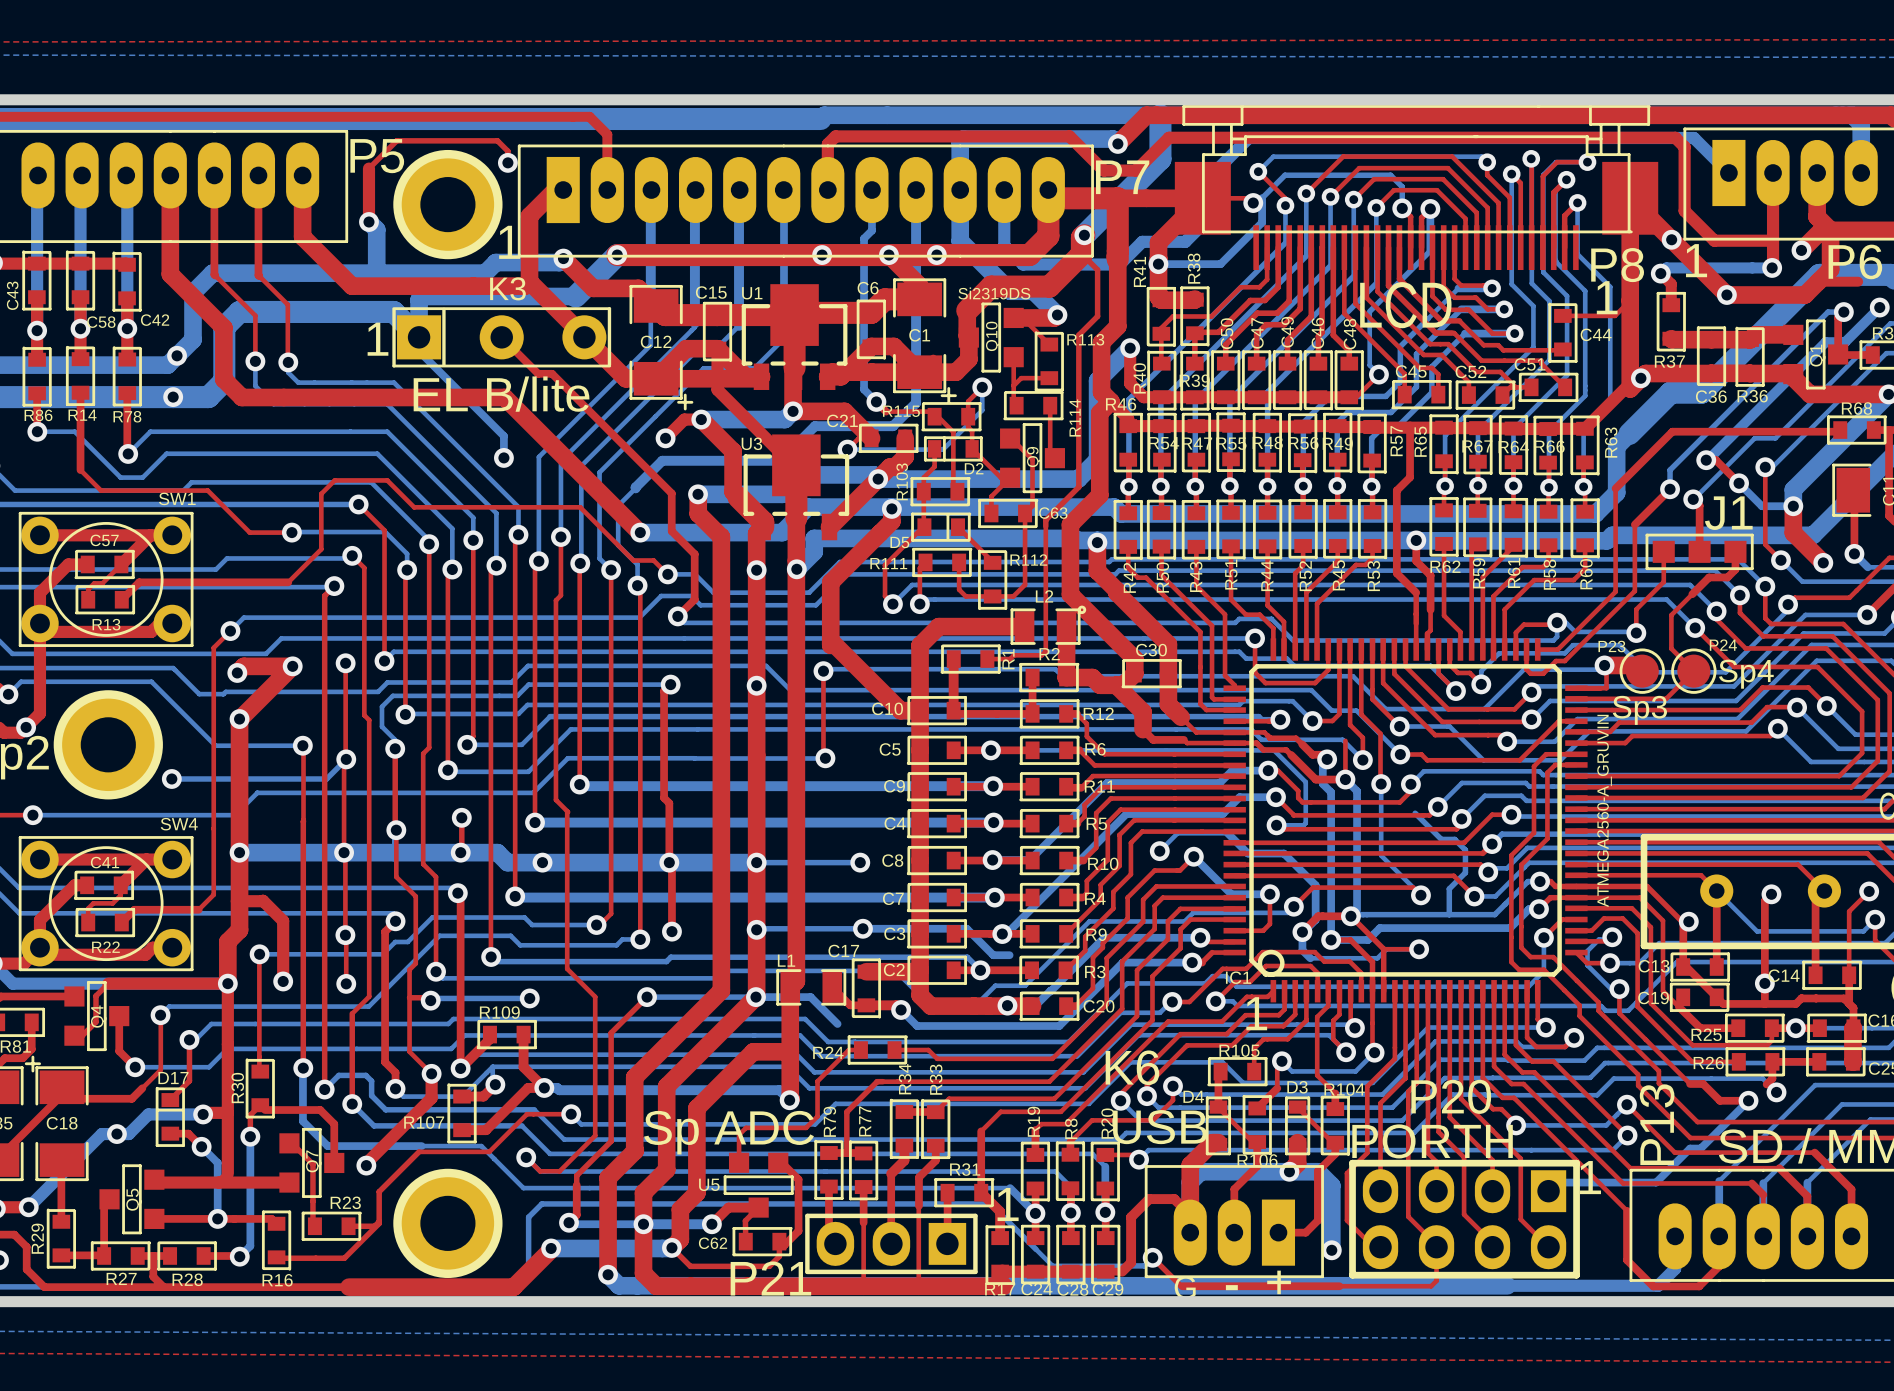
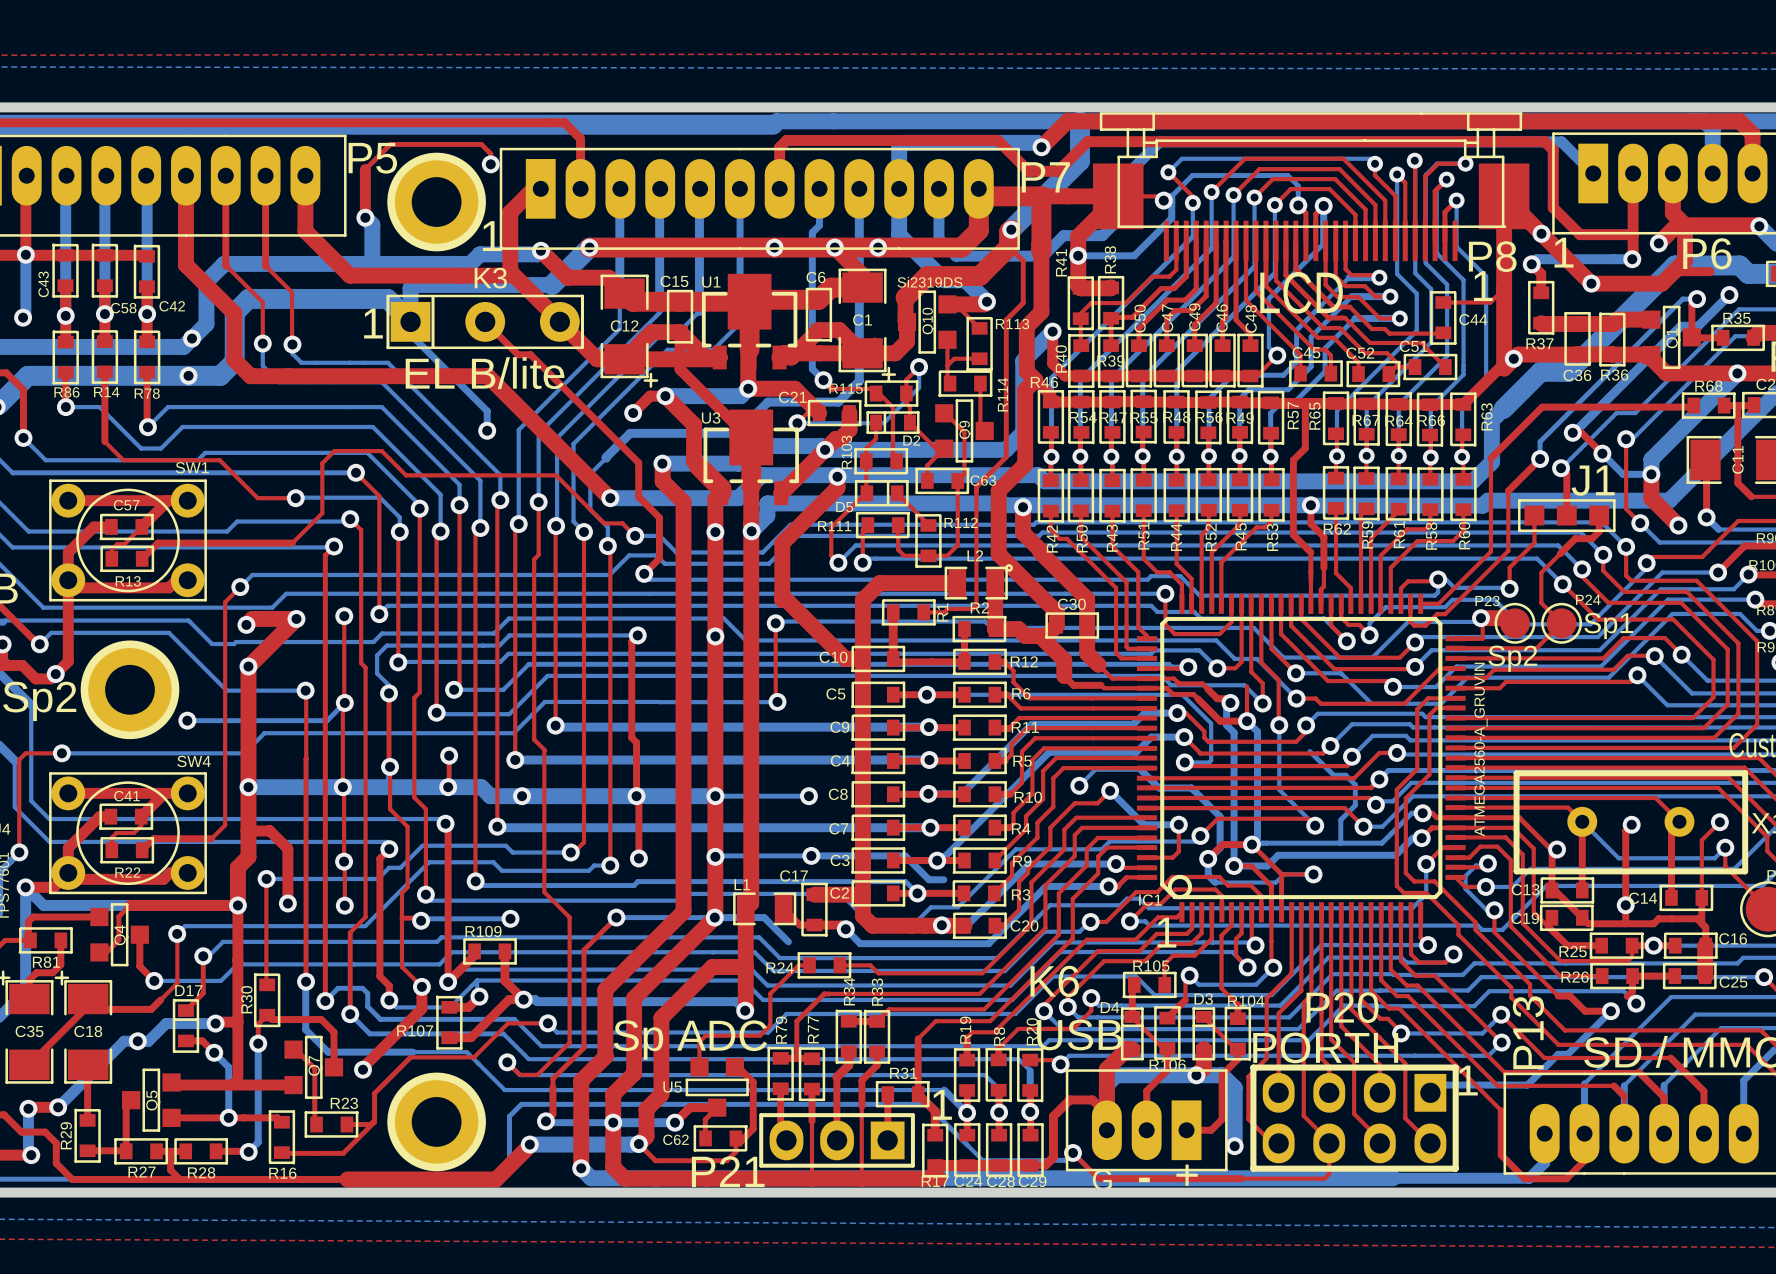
text: Sp4 (1746, 674) -> Sp1 (1608, 626)
text: Sp3 (1639, 710) -> Sp2 (1512, 658)

